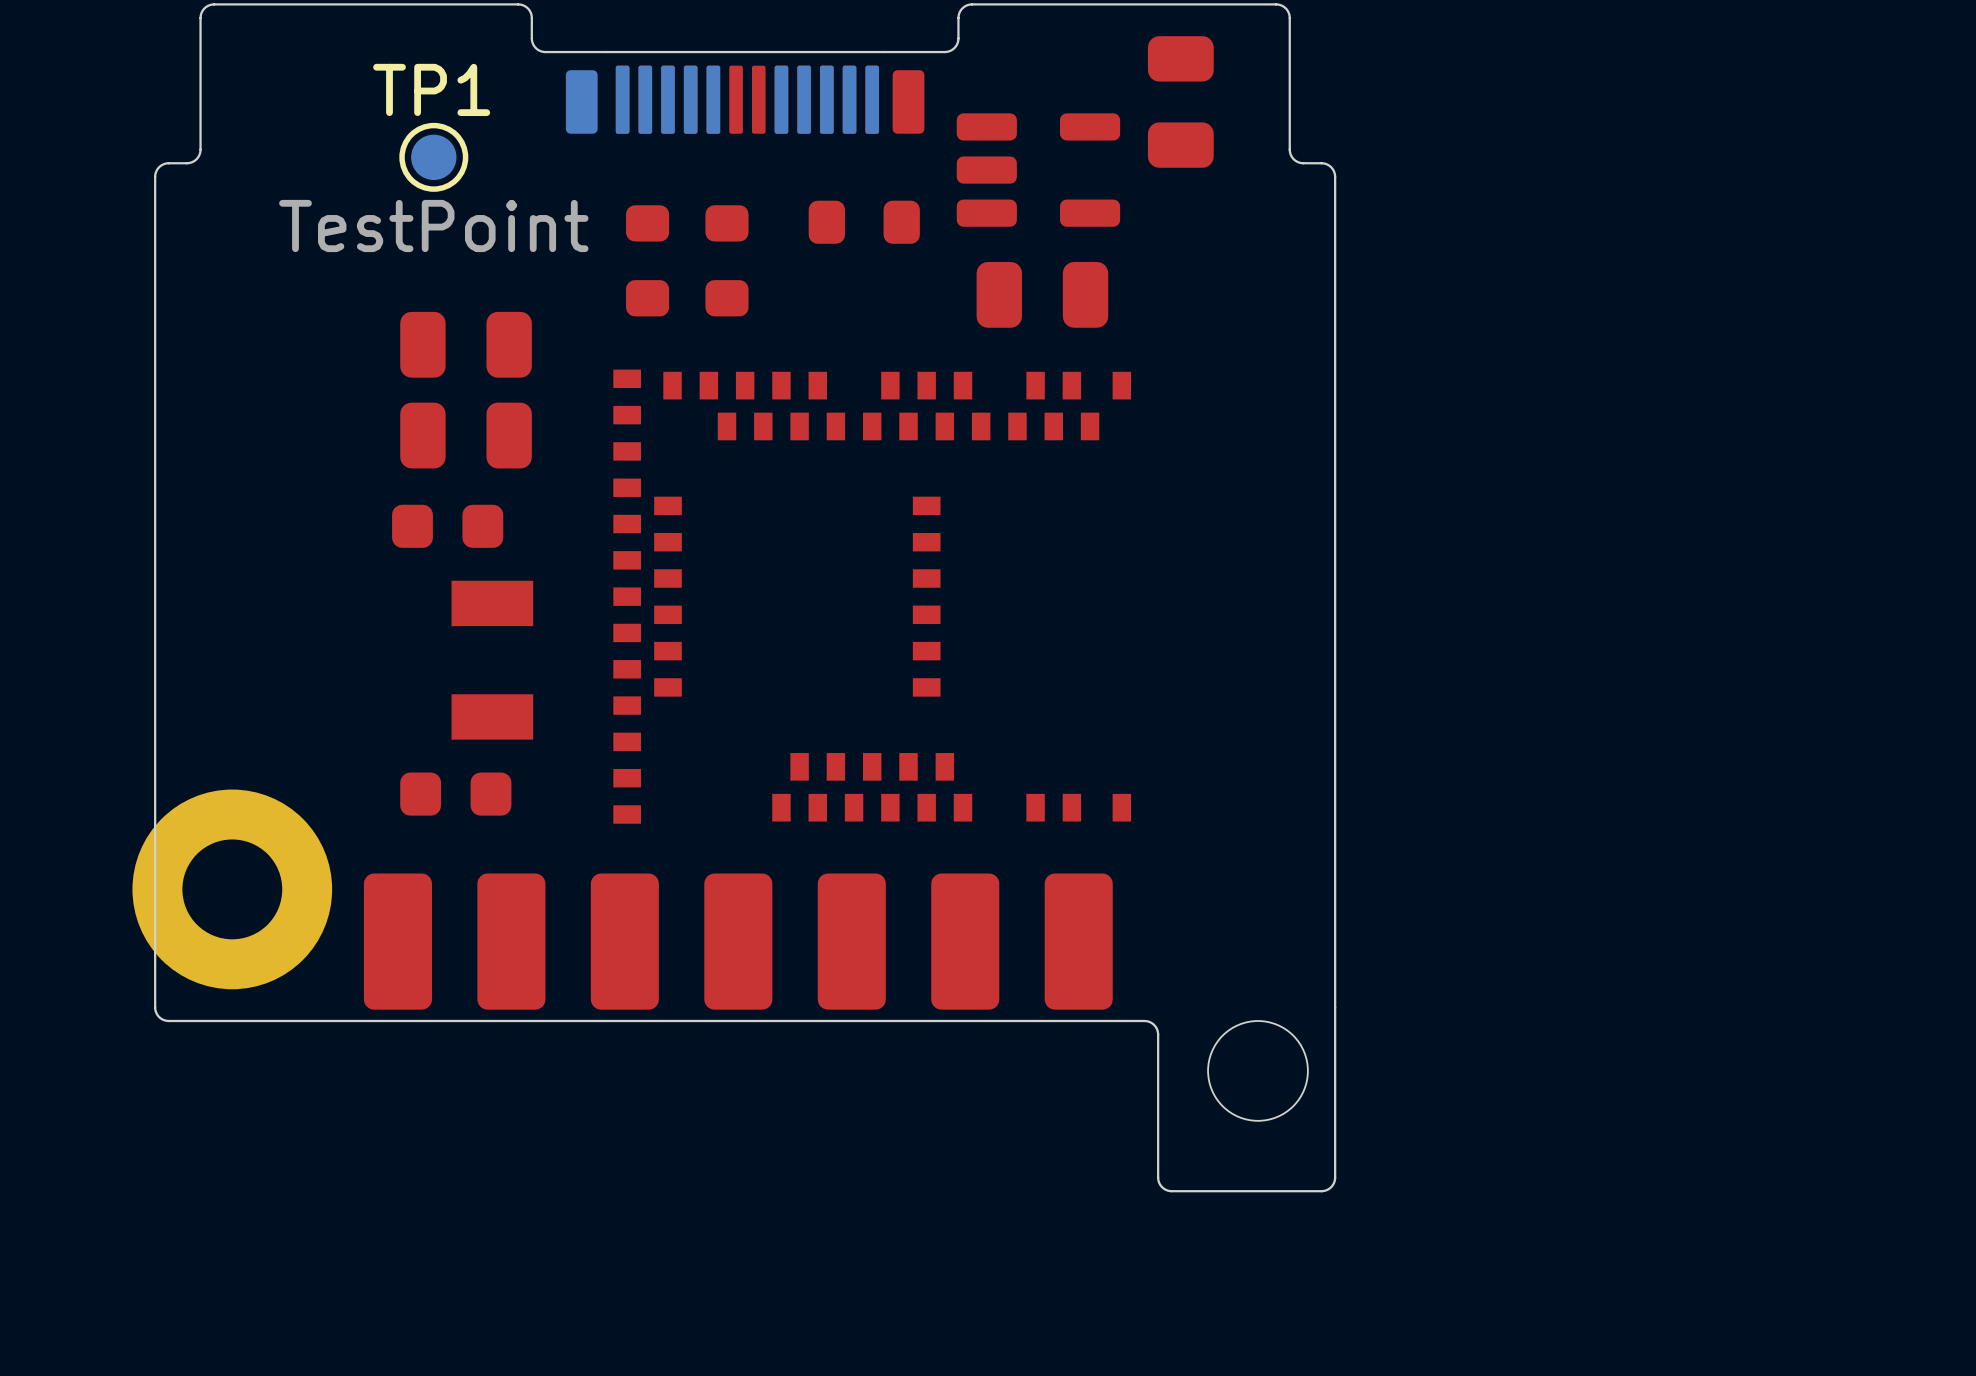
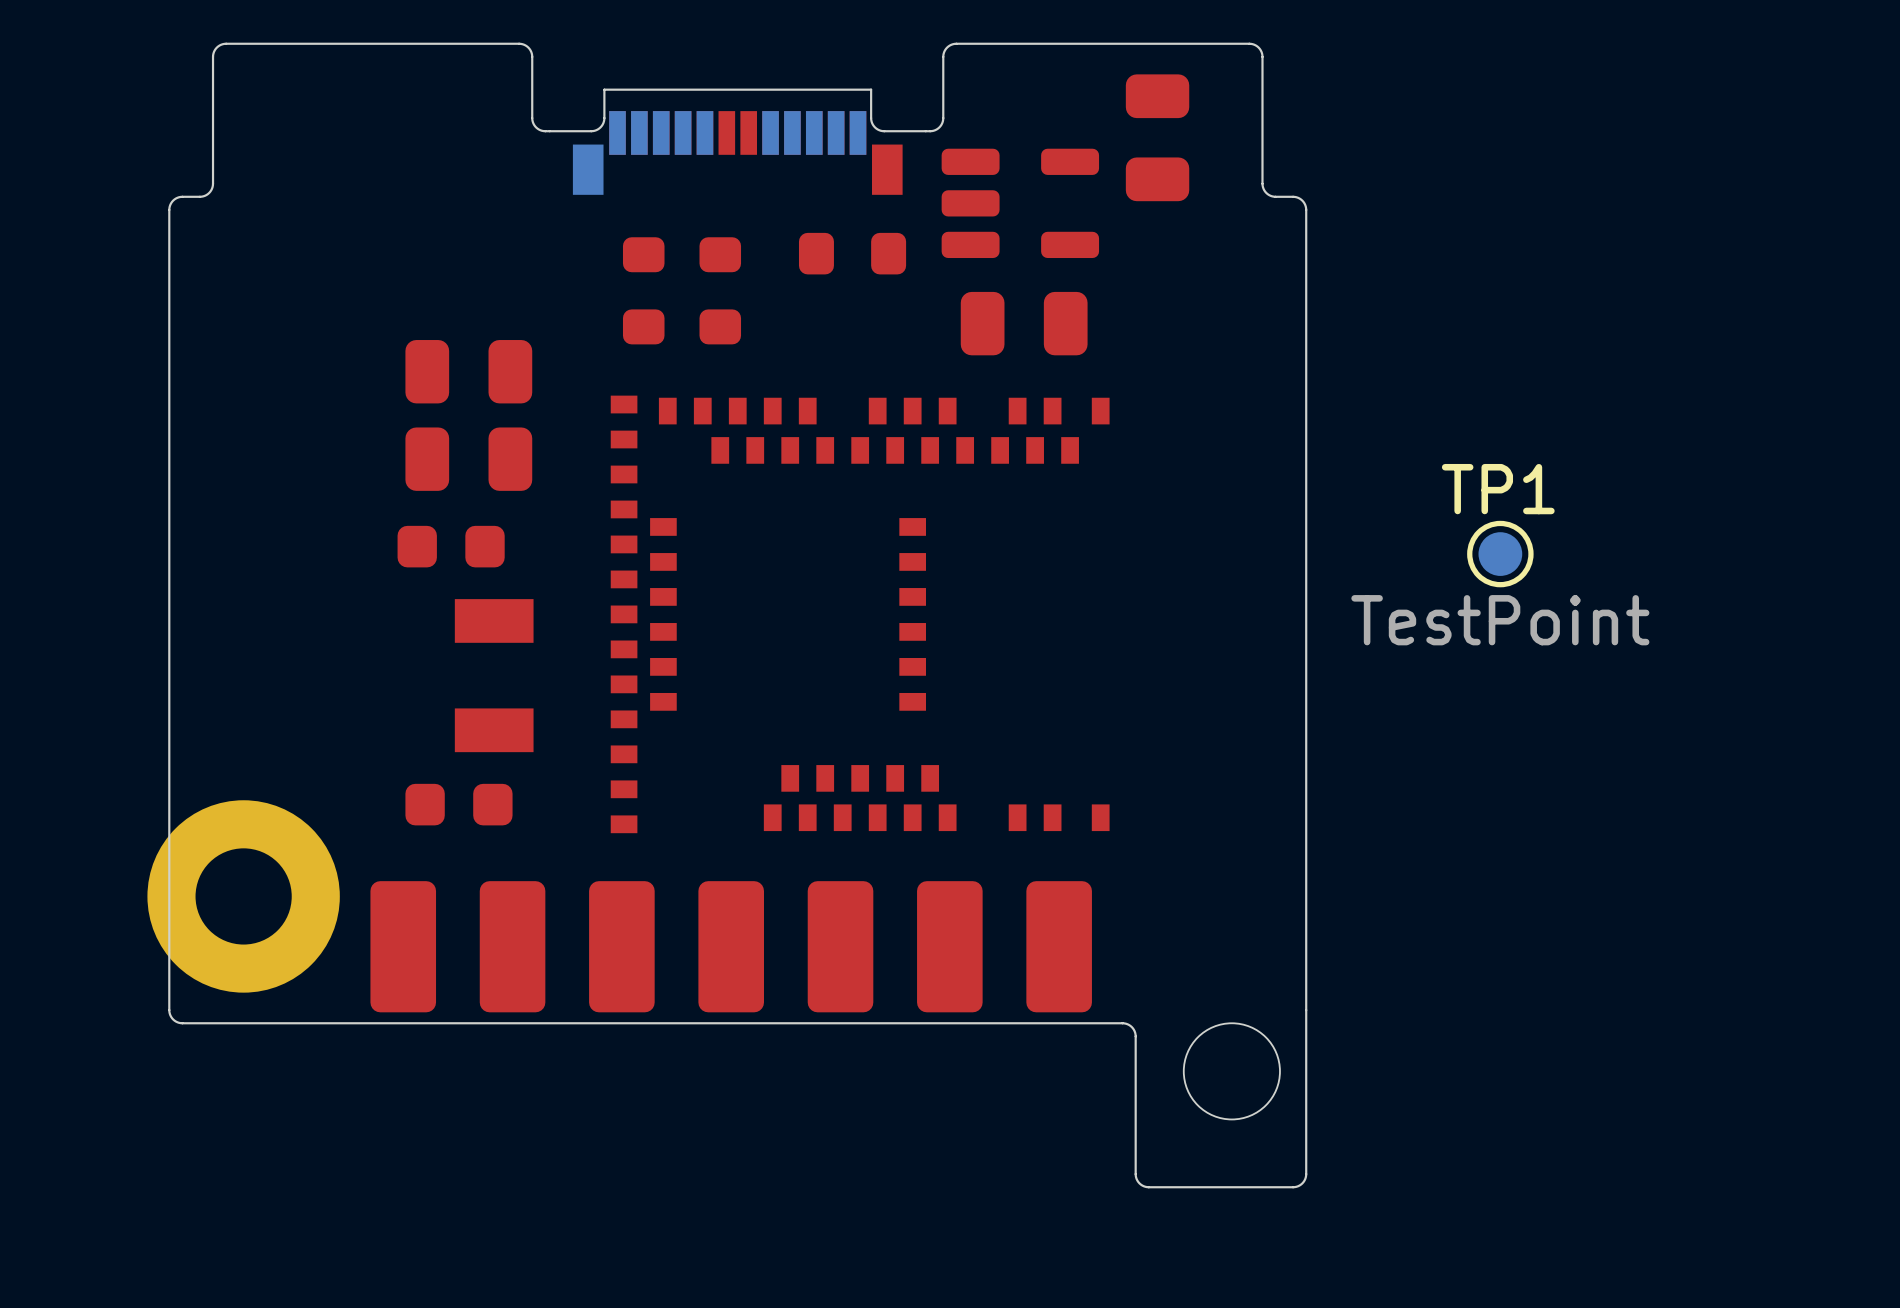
board edge: (531, 38) (535, 48) (543, 51) (606, 52) -> (532, 76) (532, 121) (536, 127) (543, 131) (591, 131) (599, 128) (604, 119) (604, 89)
board edge: (958, 38) (955, 46) (946, 51) (883, 52) -> (943, 76) (942, 121) (938, 128) (931, 131) (884, 131) (876, 128) (871, 119) (871, 89)
part footprint: [565, 65, 925, 134] -> [572, 111, 903, 195]
TP1 position: (433, 157) -> (1500, 554)

